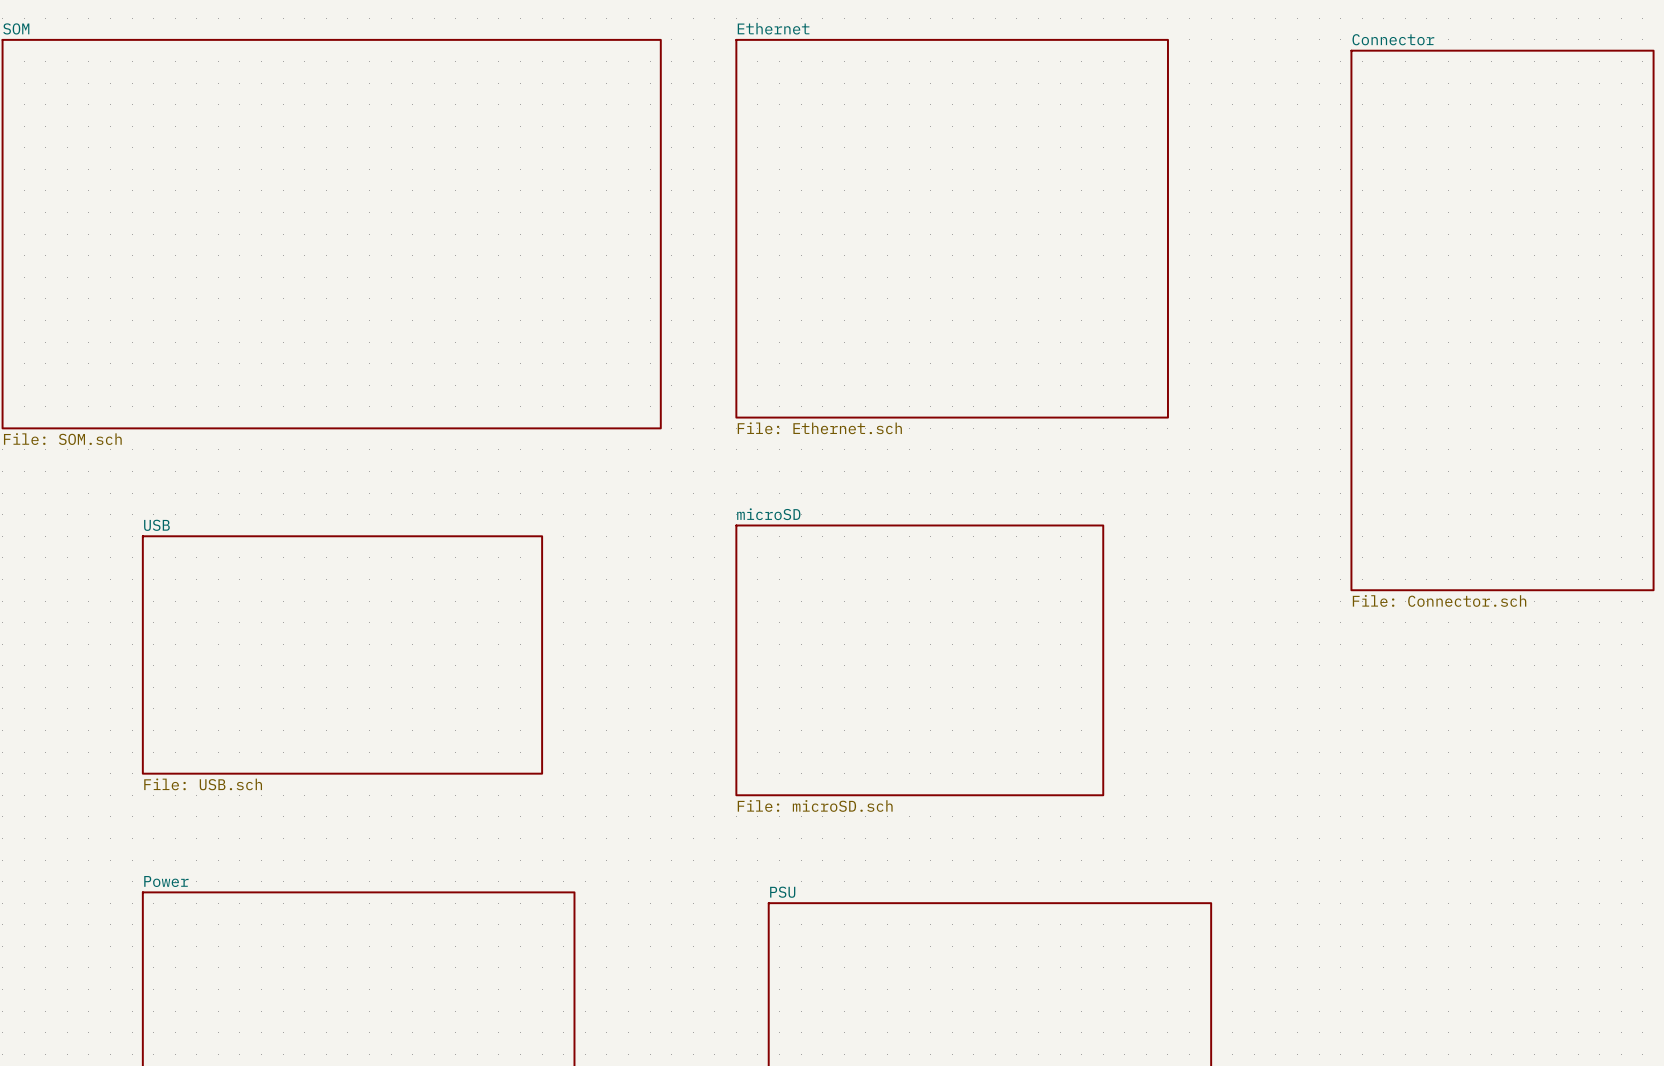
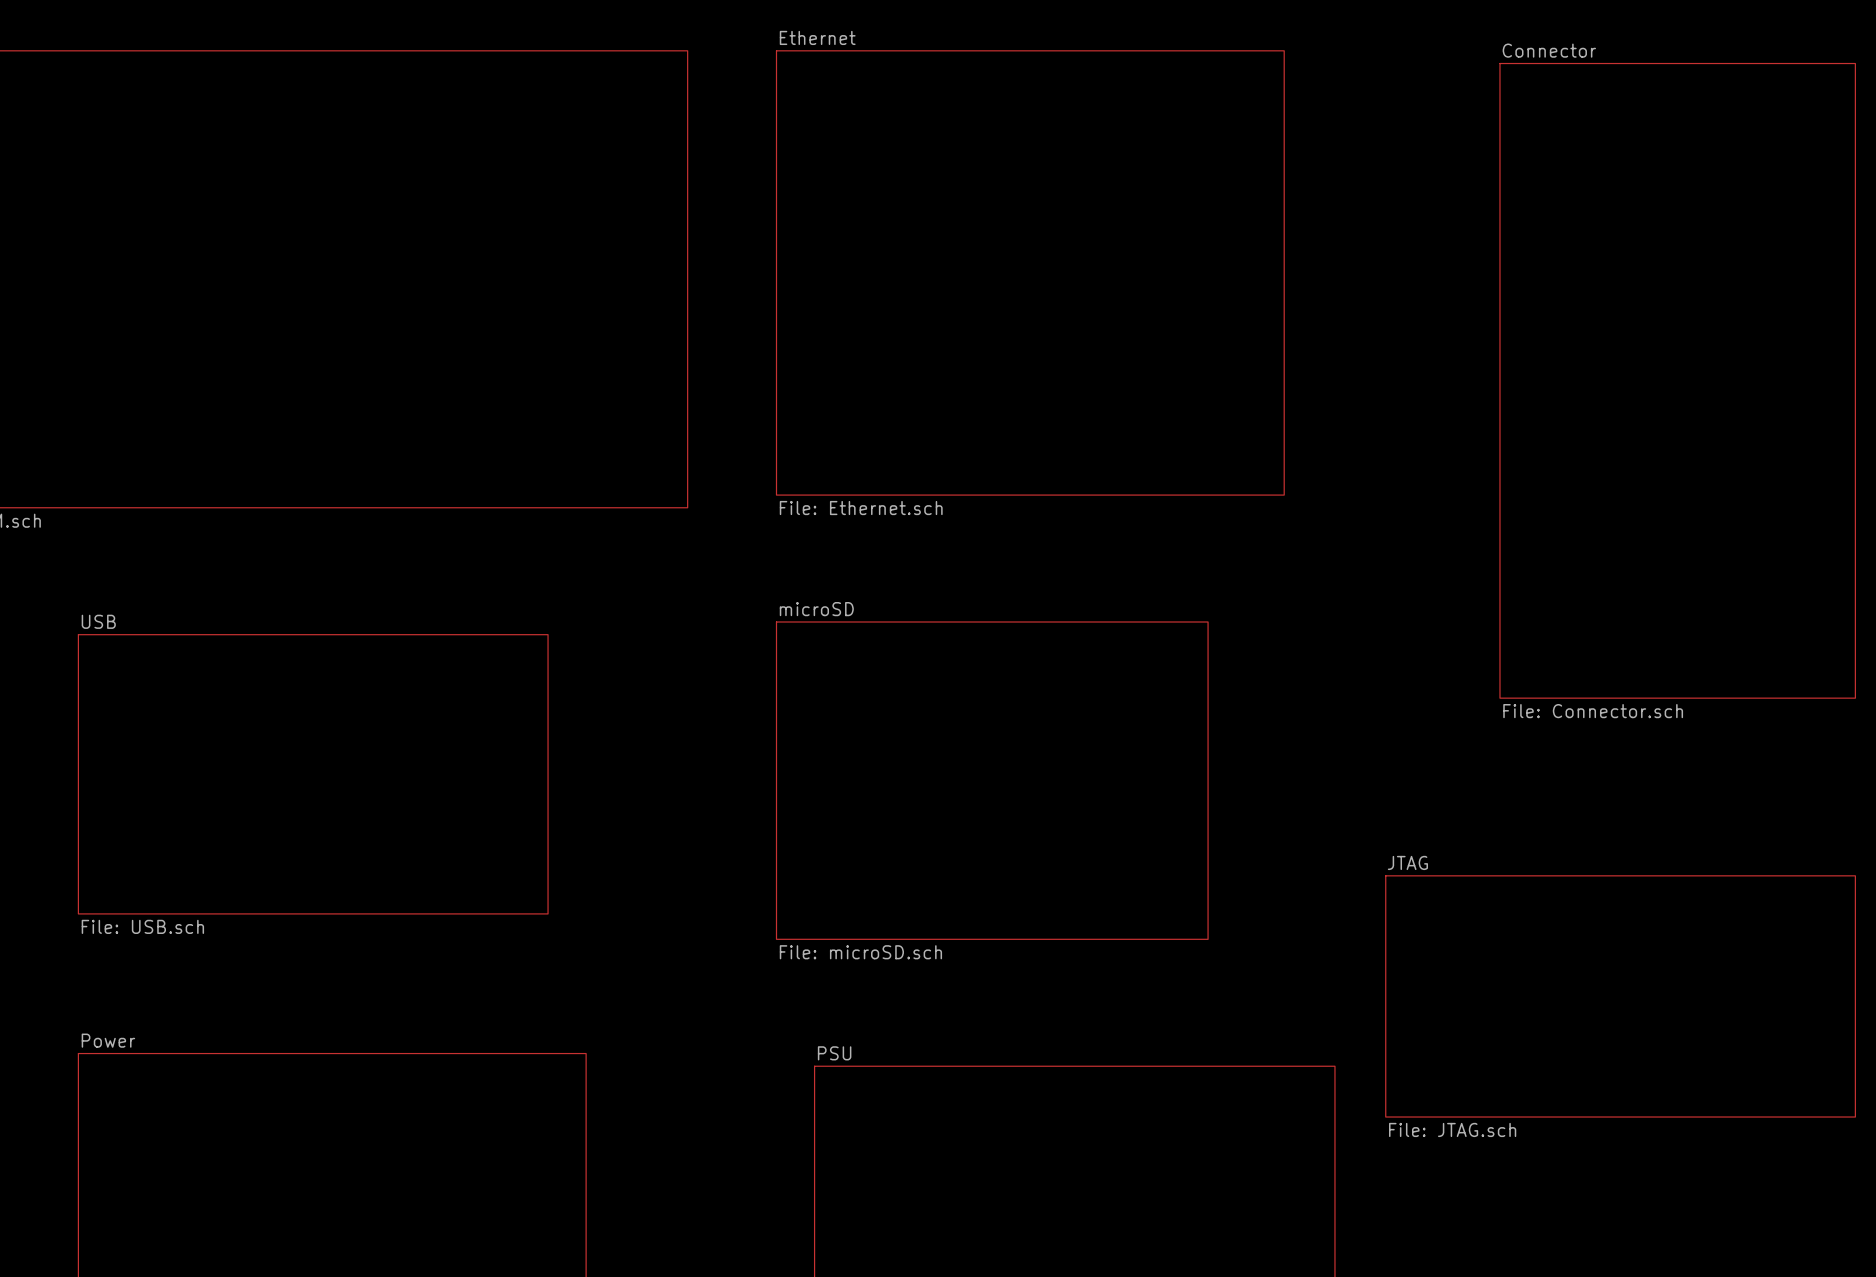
sheet JTAG: none -> File: JTAG.sch (1620, 996)

